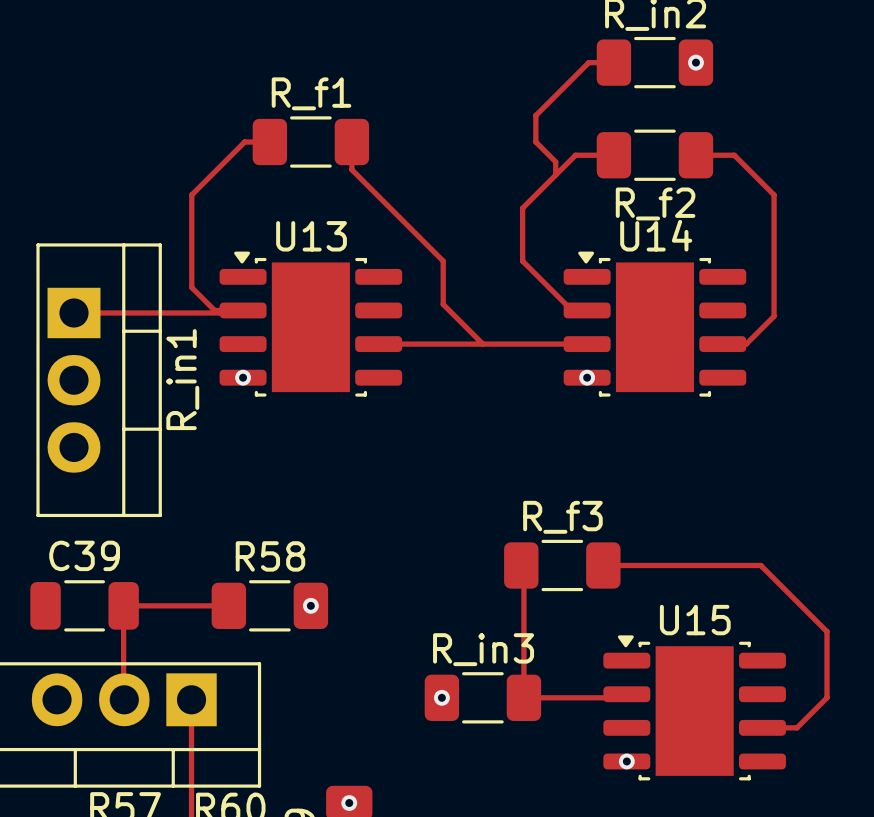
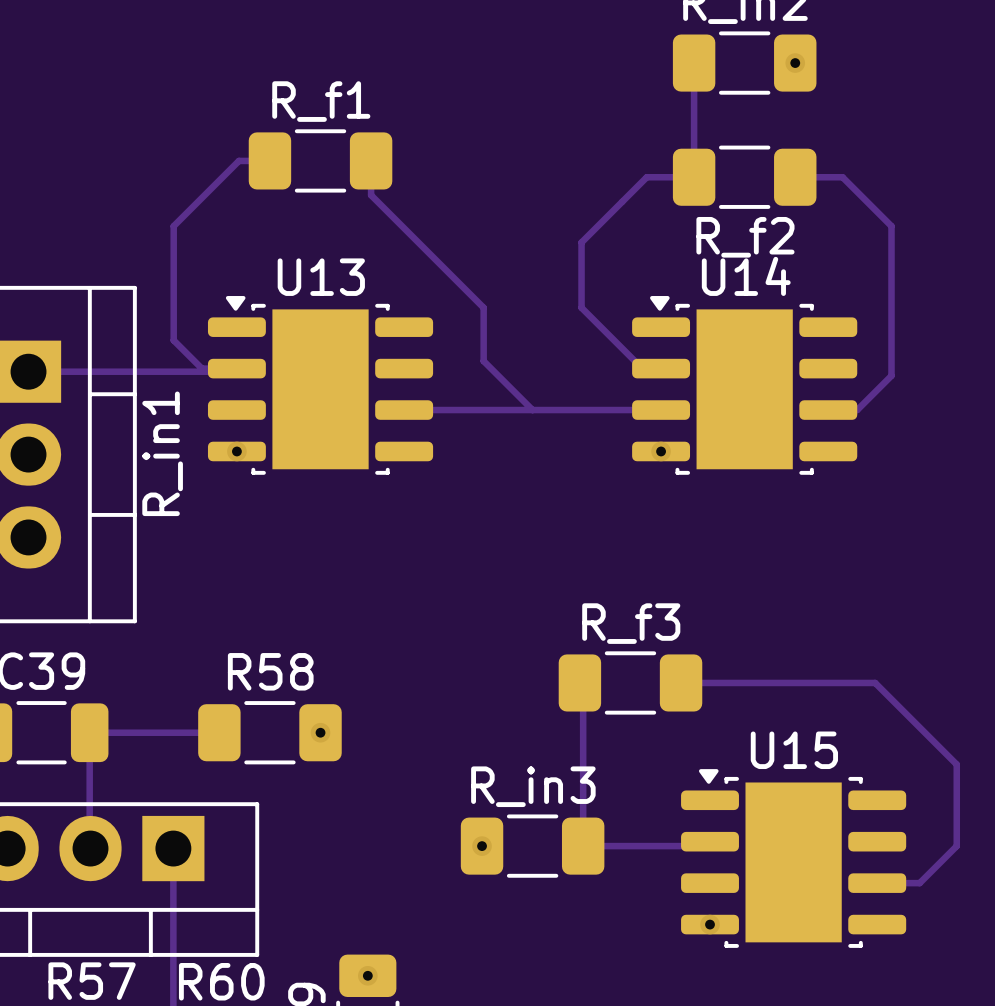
track: (613, 62) (588, 62) (535, 115) (535, 142) (555, 161) (555, 175) -> (694, 63) (694, 177)

